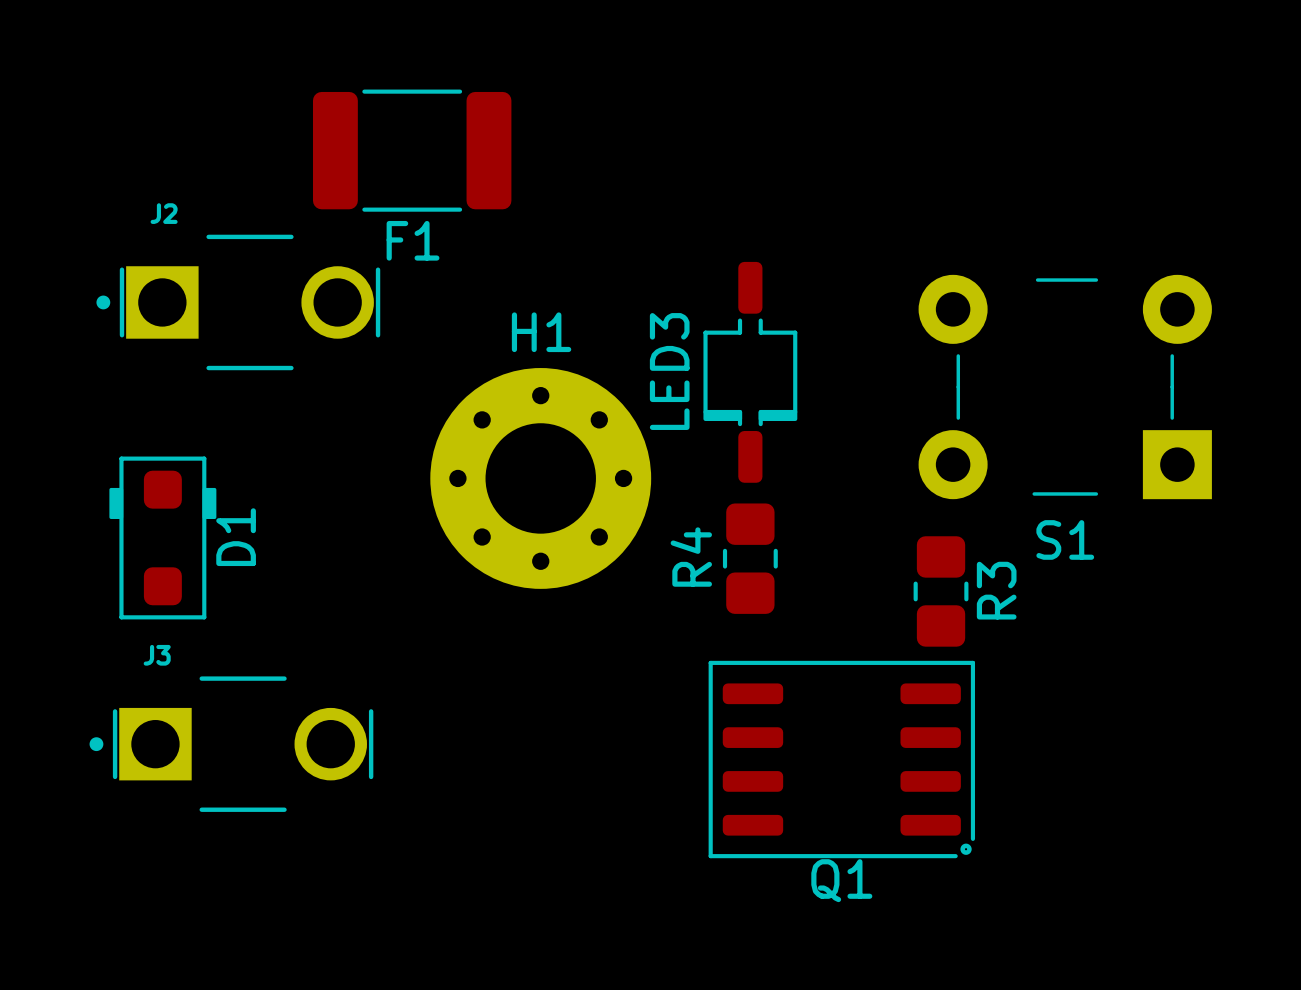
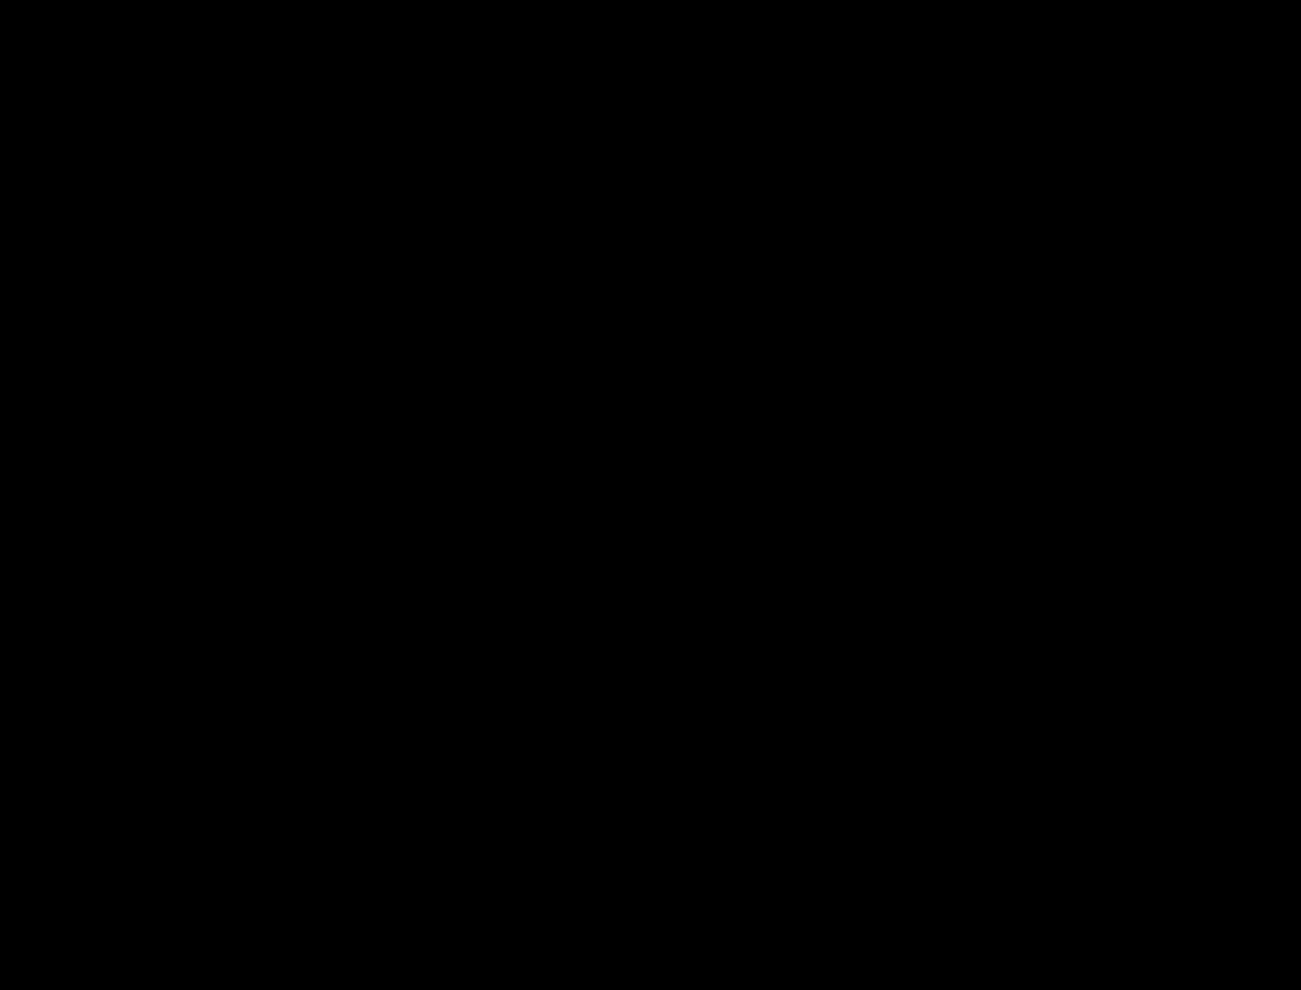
F1: (412, 150) -> none
J2: (238, 302) -> none
LED3: (750, 372) -> none
S1: (1065, 387) -> none
H1: (540, 478) -> none
D1: (162, 537) -> none
R4: (750, 558) -> none
R3: (941, 591) -> none
J3: (231, 744) -> none
Q1: (841, 759) -> none

